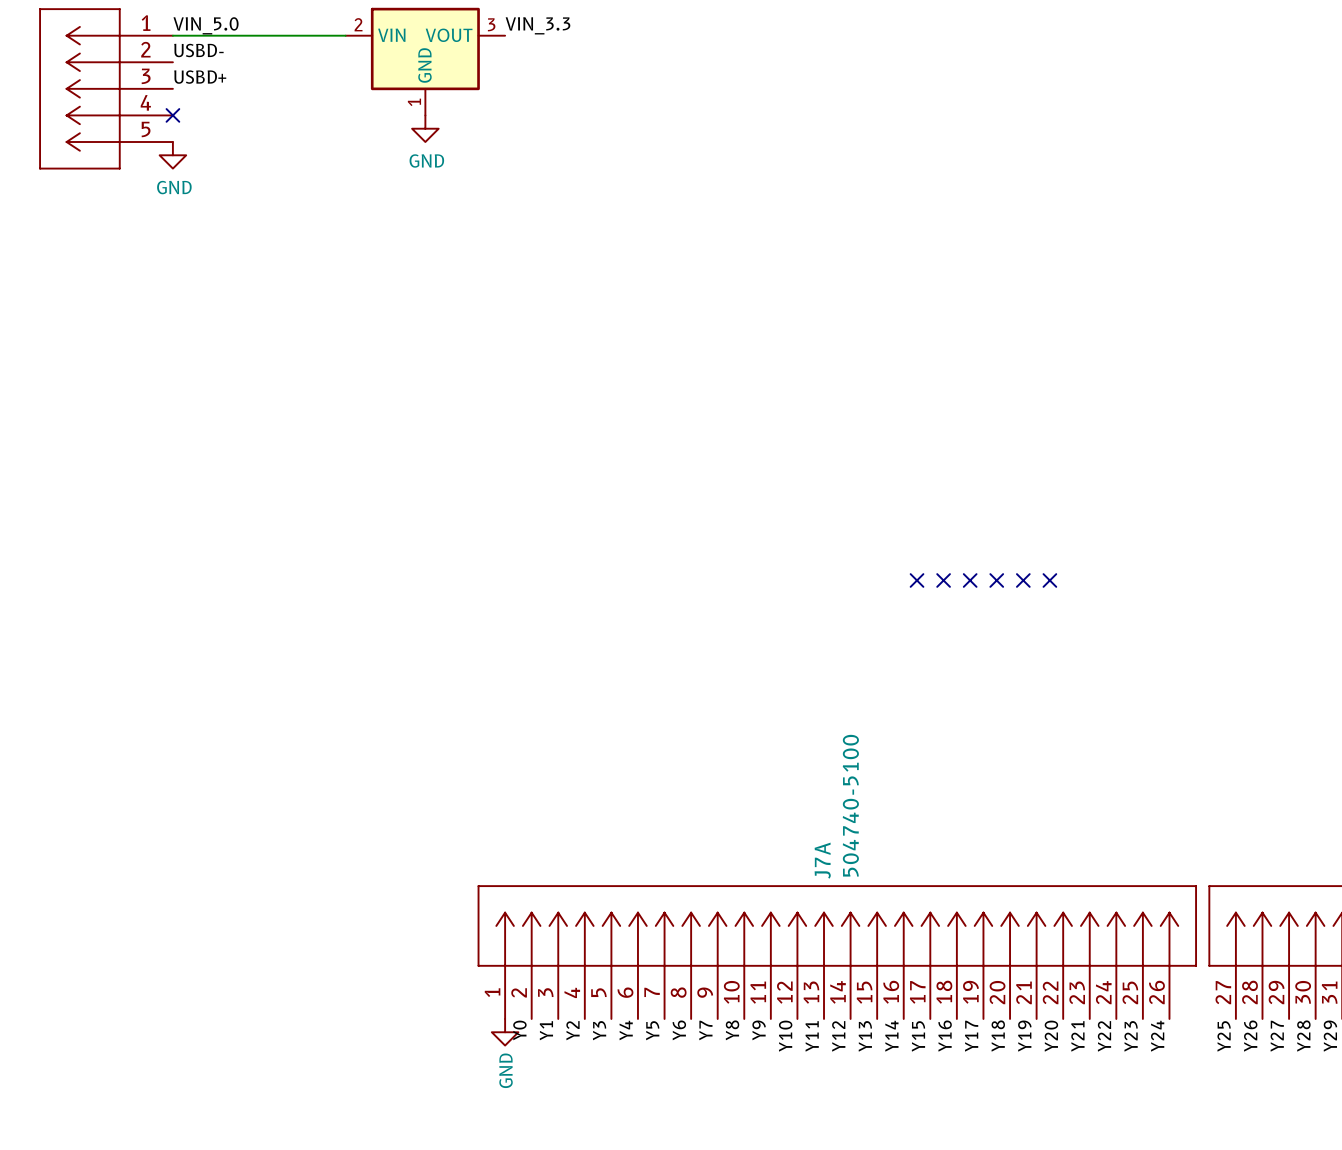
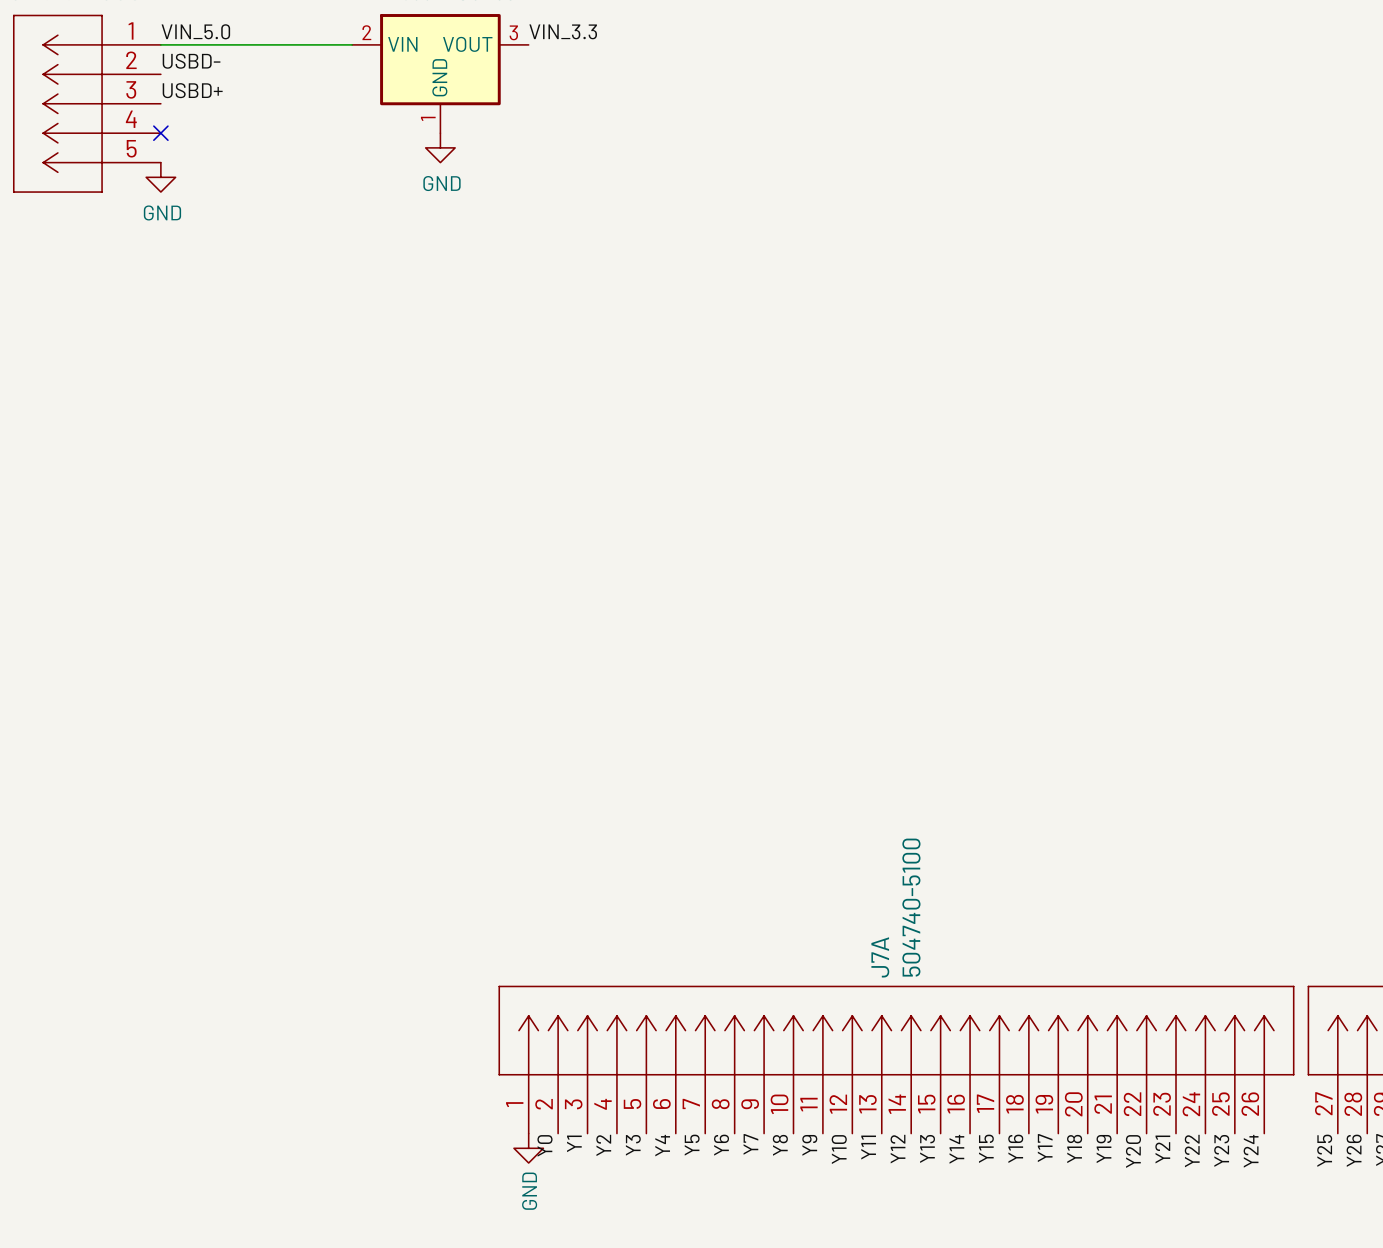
no-connect mark: (917, 580) -> none
no-connect mark: (943, 580) -> none
no-connect mark: (970, 580) -> none
no-connect mark: (996, 580) -> none
no-connect mark: (1023, 580) -> none
no-connect mark: (1049, 580) -> none

